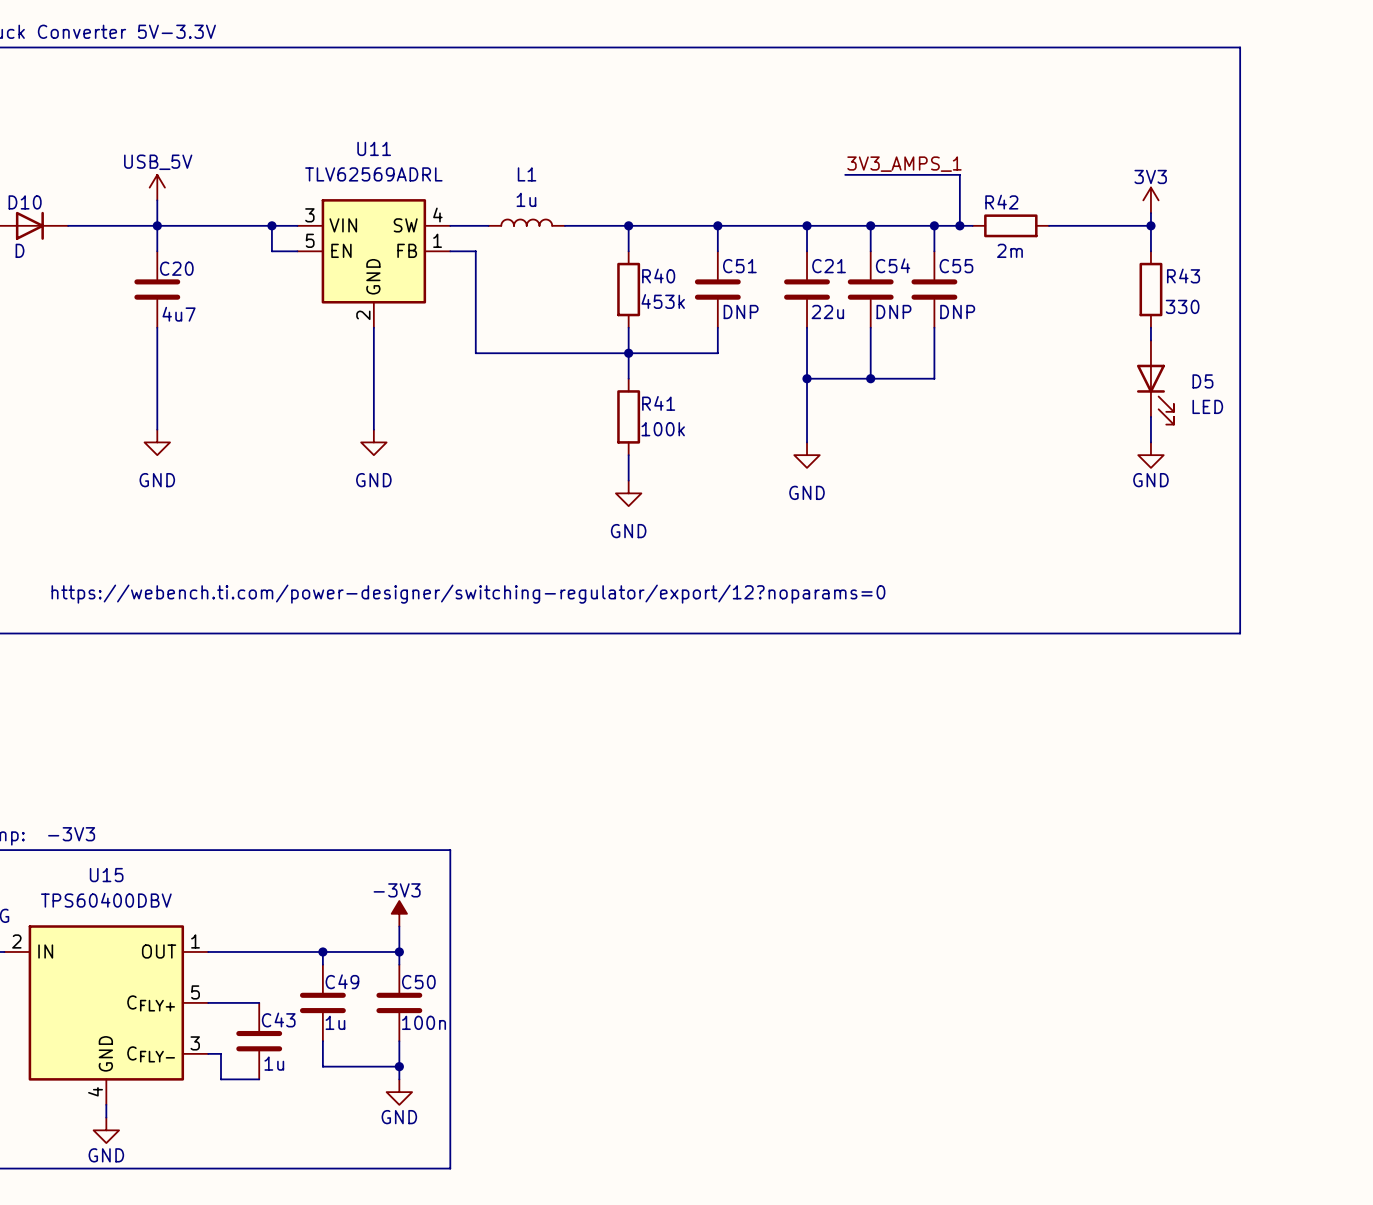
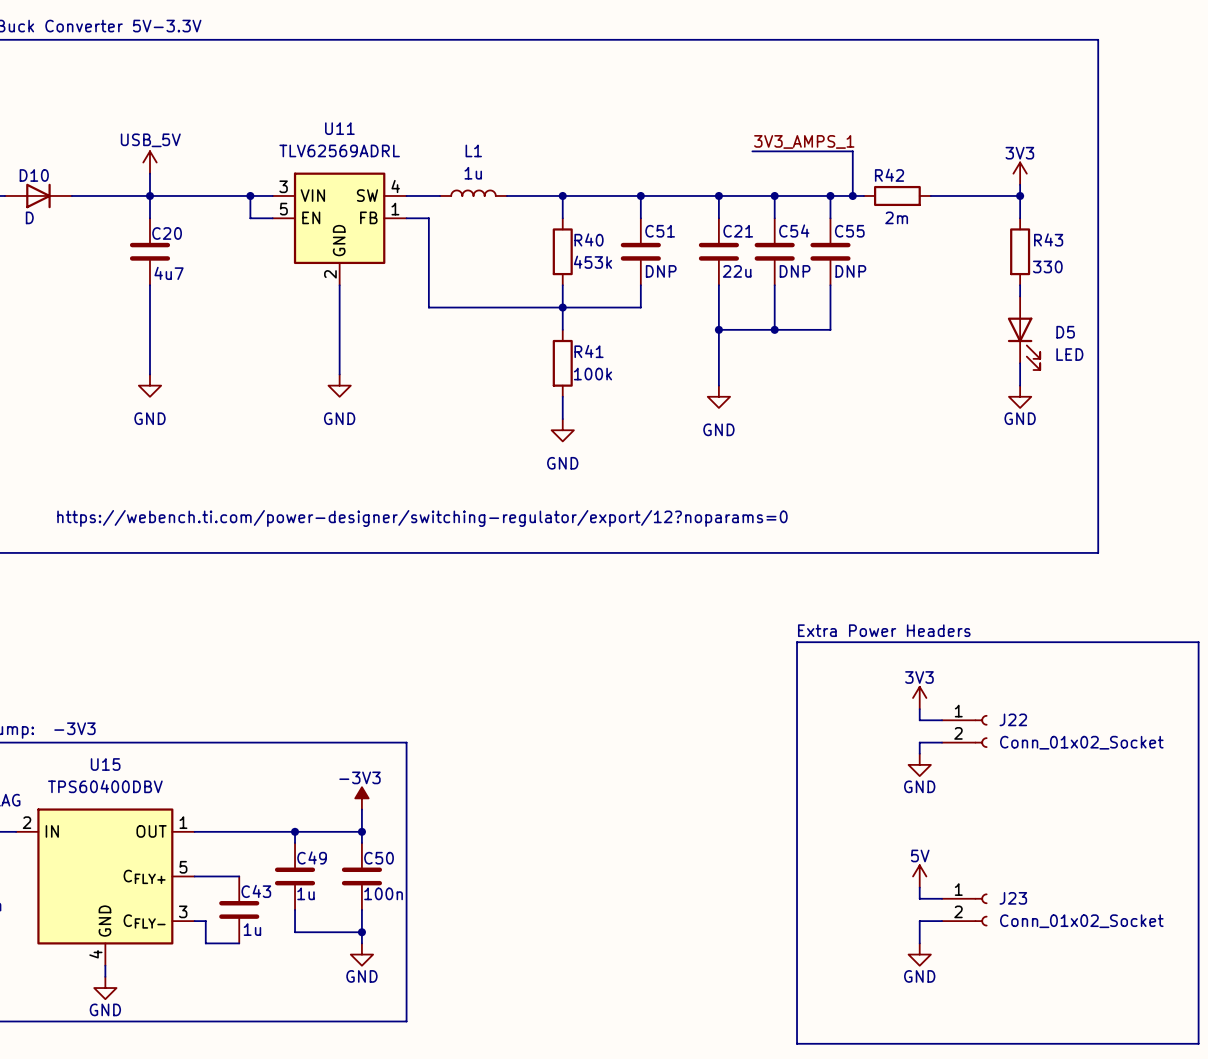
text: none -> Extra Power Headers (884, 630)
line: none -> (797, 642) (1198, 642) (1198, 1043) (797, 1043) (797, 642)
power symbol: none -> 3V3 (919, 697)
wire: none -> (919, 709) (919, 720) (942, 720)
J22: none -> Conn_01x02_Socket (964, 731)
wire: none -> (942, 742) (919, 742) (919, 753)
power symbol: none -> GND (919, 764)
power symbol: none -> 5V (919, 876)
wire: none -> (919, 887) (919, 898) (942, 898)
J23: none -> Conn_01x02_Socket (964, 909)
wire: none -> (942, 921) (919, 921) (919, 943)
power symbol: none -> GND (919, 954)

